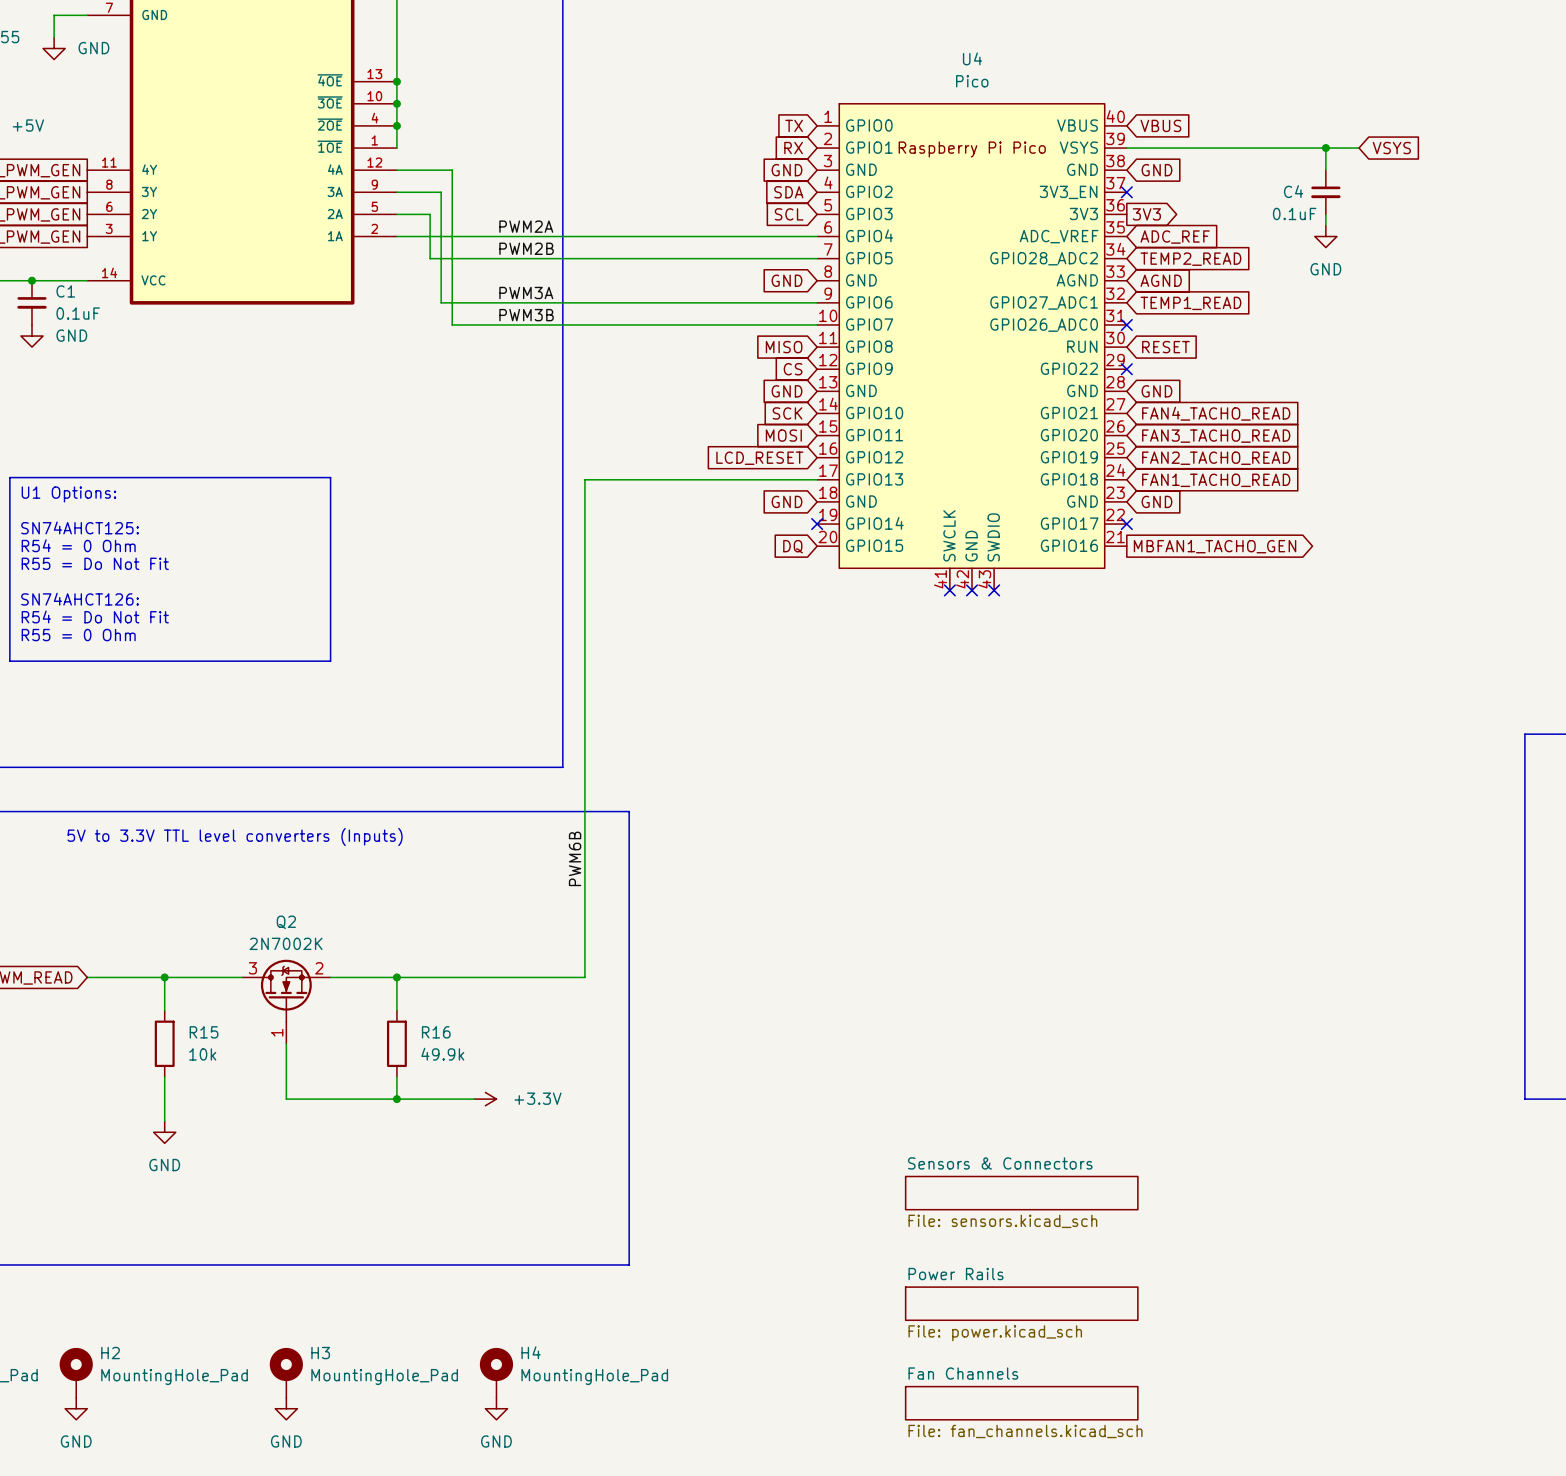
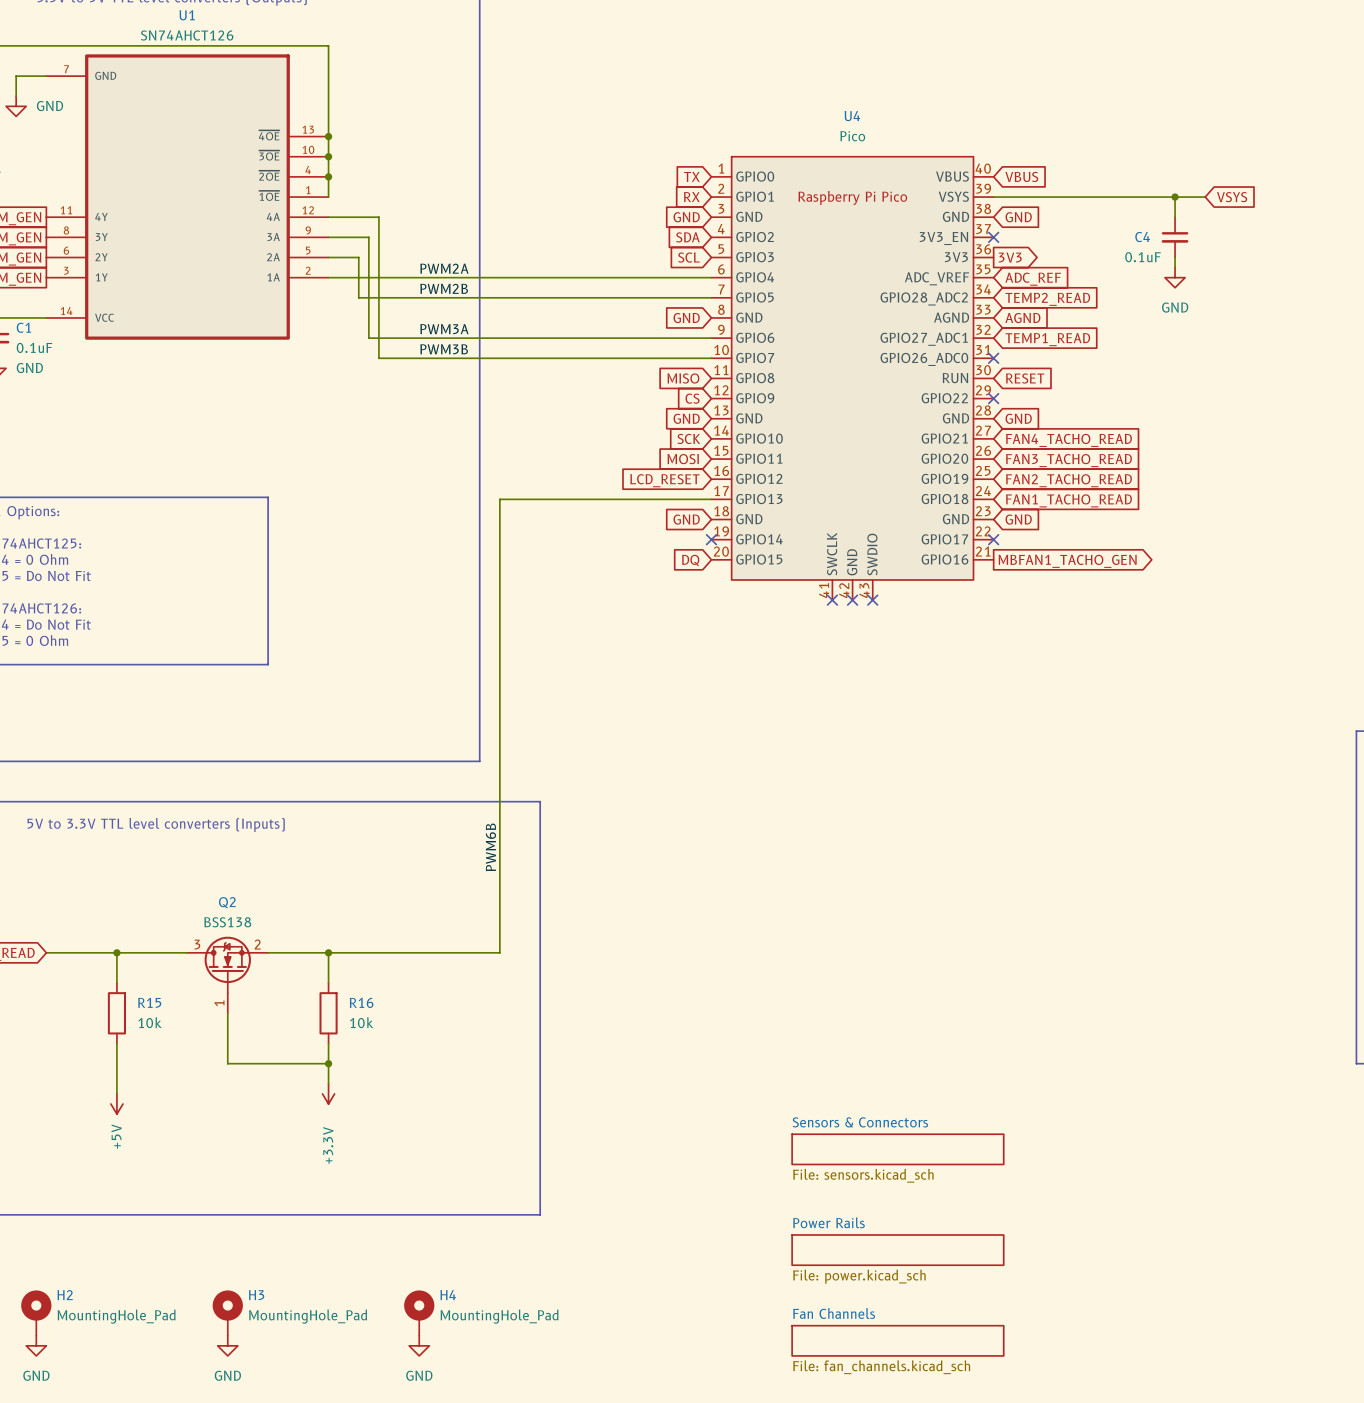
Q2 value: 2N7002K (286, 943) -> BSS138 (227, 922)
R16 value: 49.9k (442, 1054) -> 10k (361, 1022)
wire: (396, 1099) (474, 1099) -> (328, 1063) (328, 1083)
power symbol rotation: 0° (485, 1099) -> 90° clockwise (328, 1093)
power symbol position: +3.3V (485, 1099) -> +3.3V (328, 1093)
power symbol: GND (164, 1132) -> none
power symbol: none -> +5V (116, 1104)

